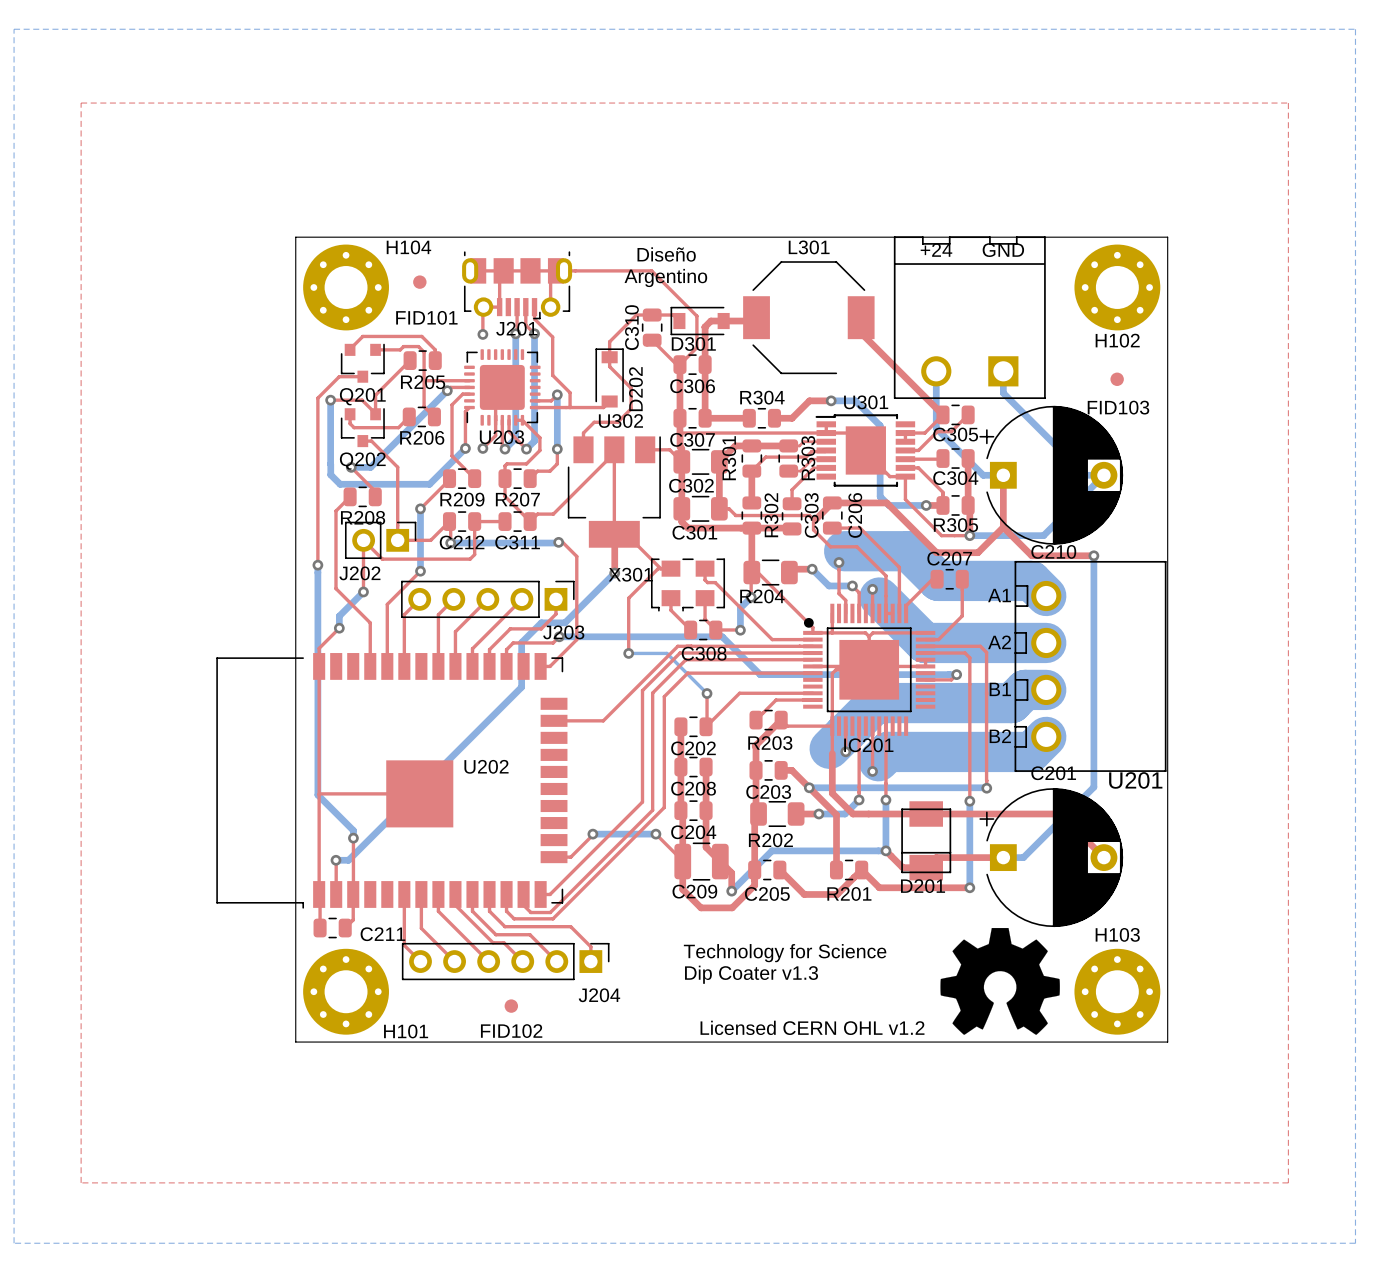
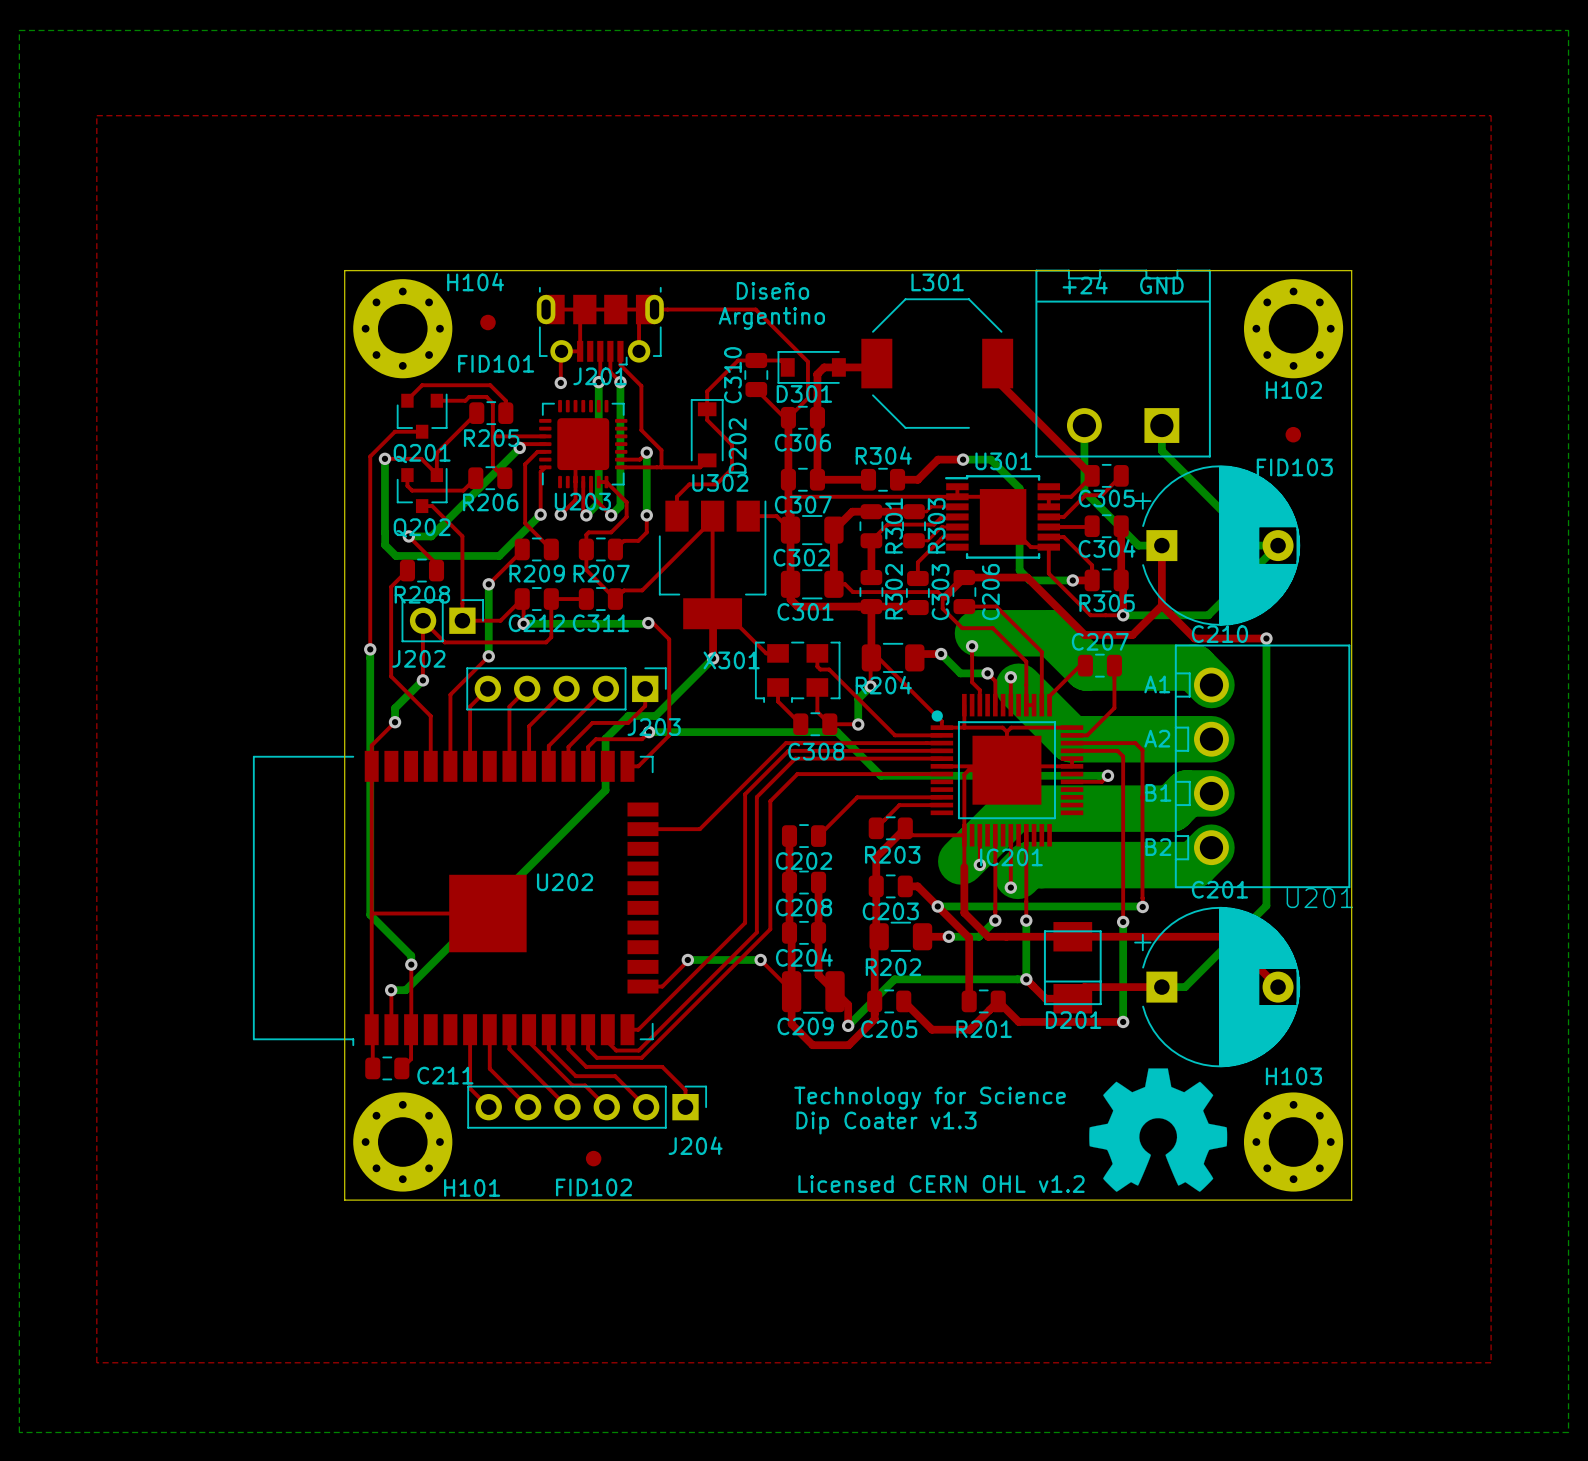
R301 name position: R301 (729, 458) -> R301 (894, 525)
top track: (660, 568) (658, 568) (628, 598) (628, 653) -> none
bottom track: (628, 653) (666, 653) (707, 693) -> none
via: (628, 653) -> none
top track: (707, 693) (707, 725) -> none
via: (707, 693) -> none

